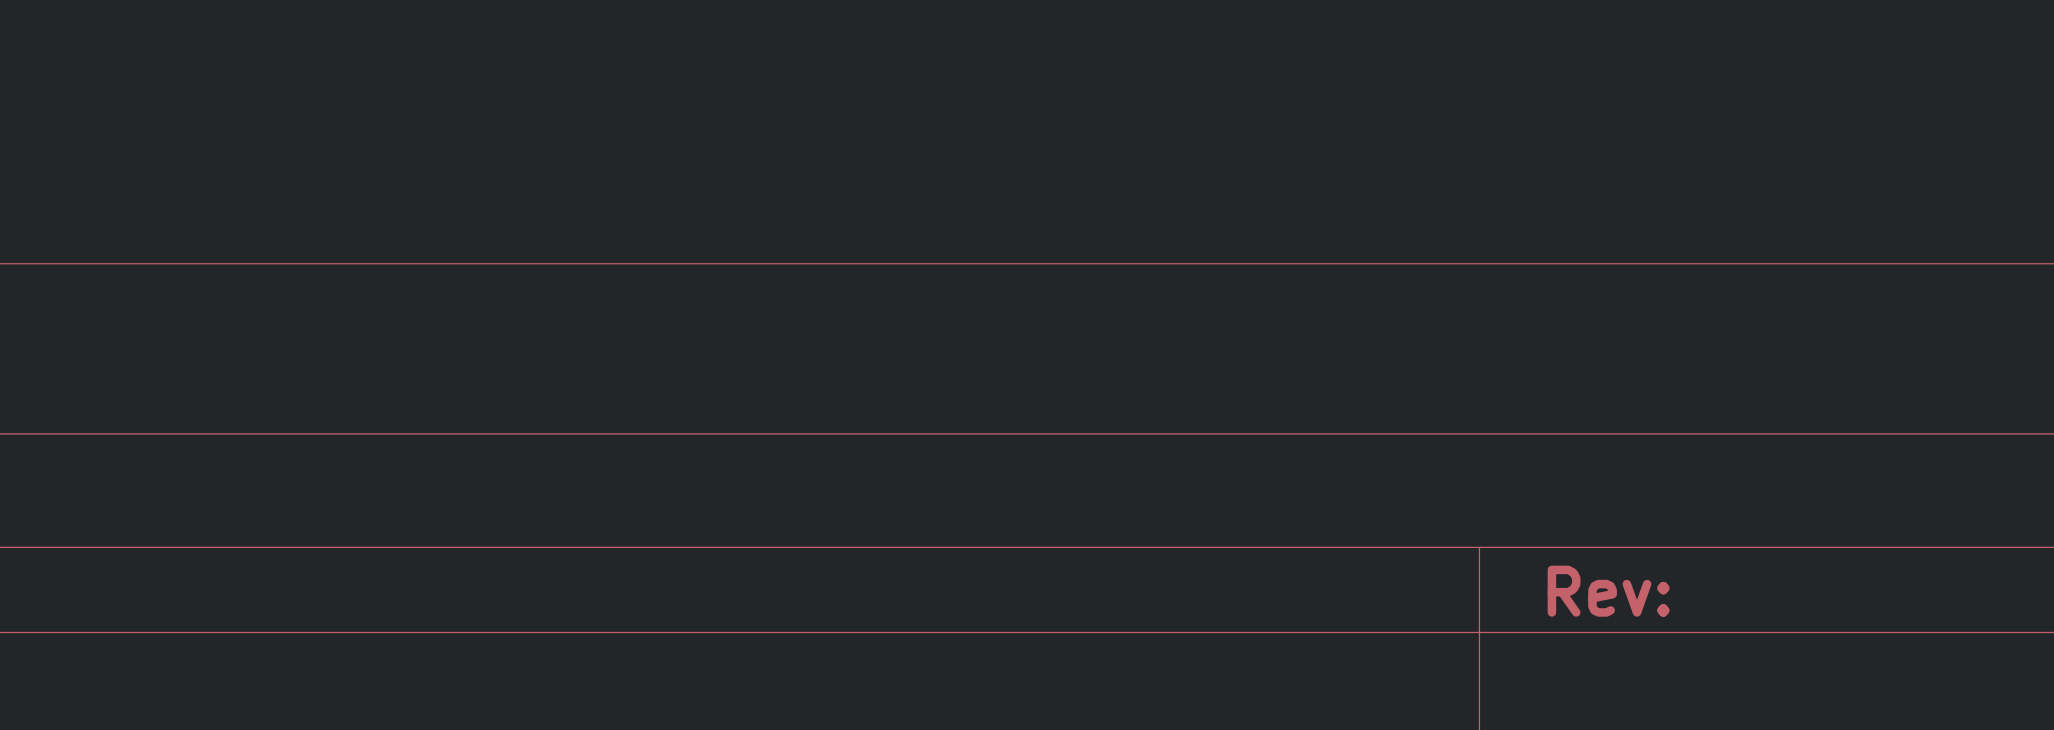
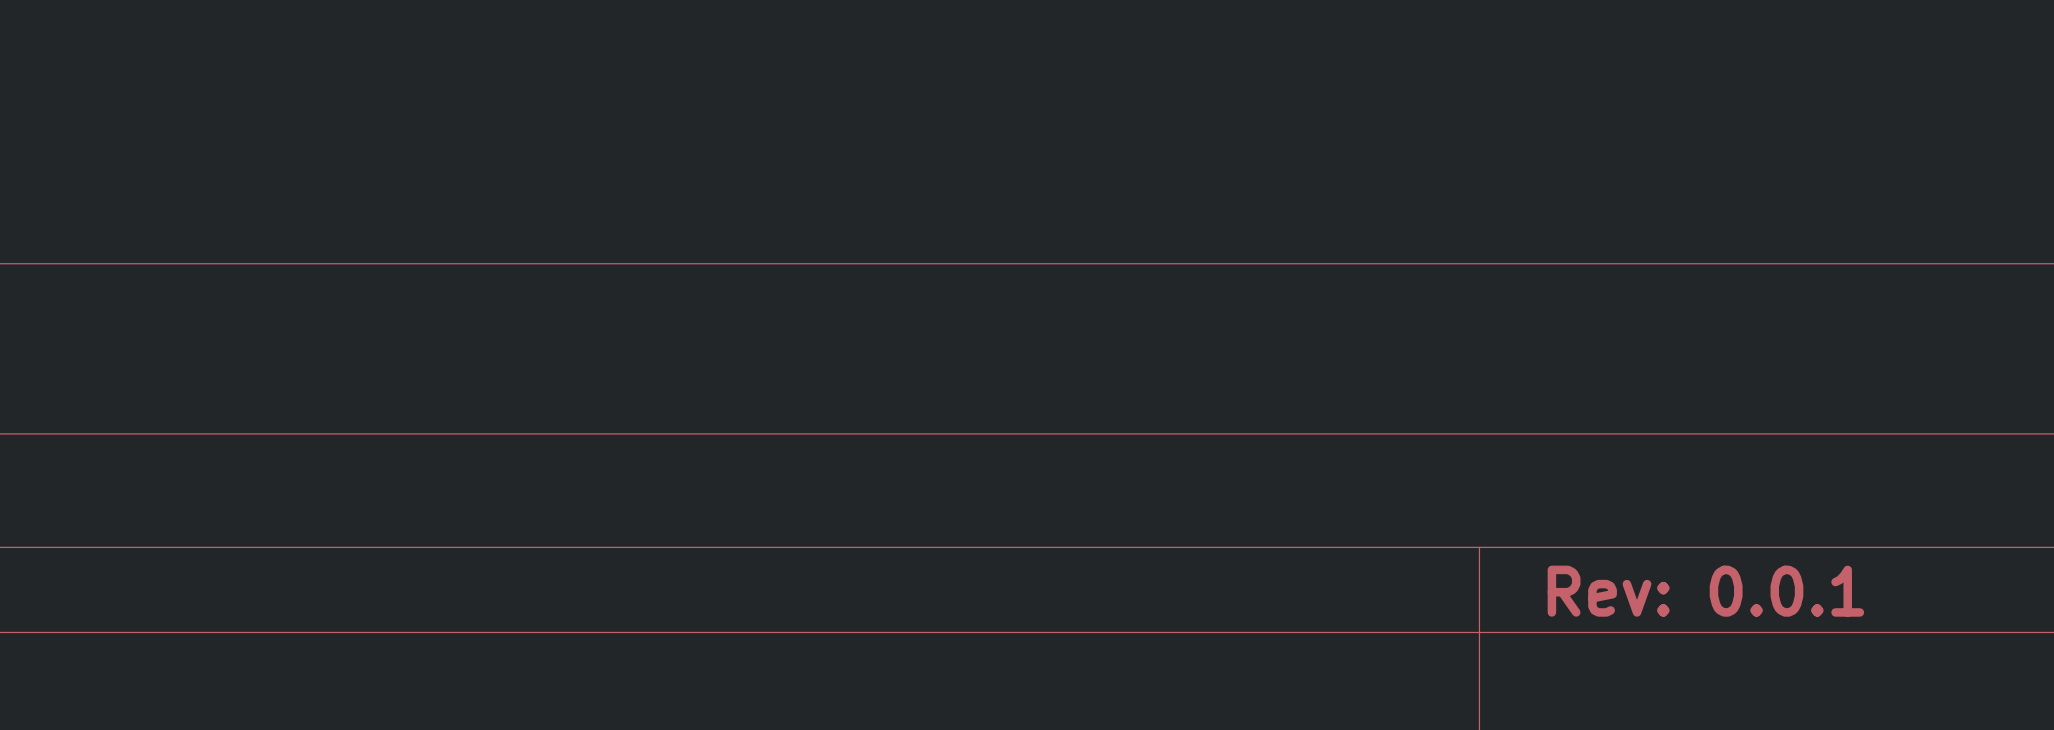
title block: Rev: (1608, 591) -> Rev: 0.0.1 (1705, 591)

